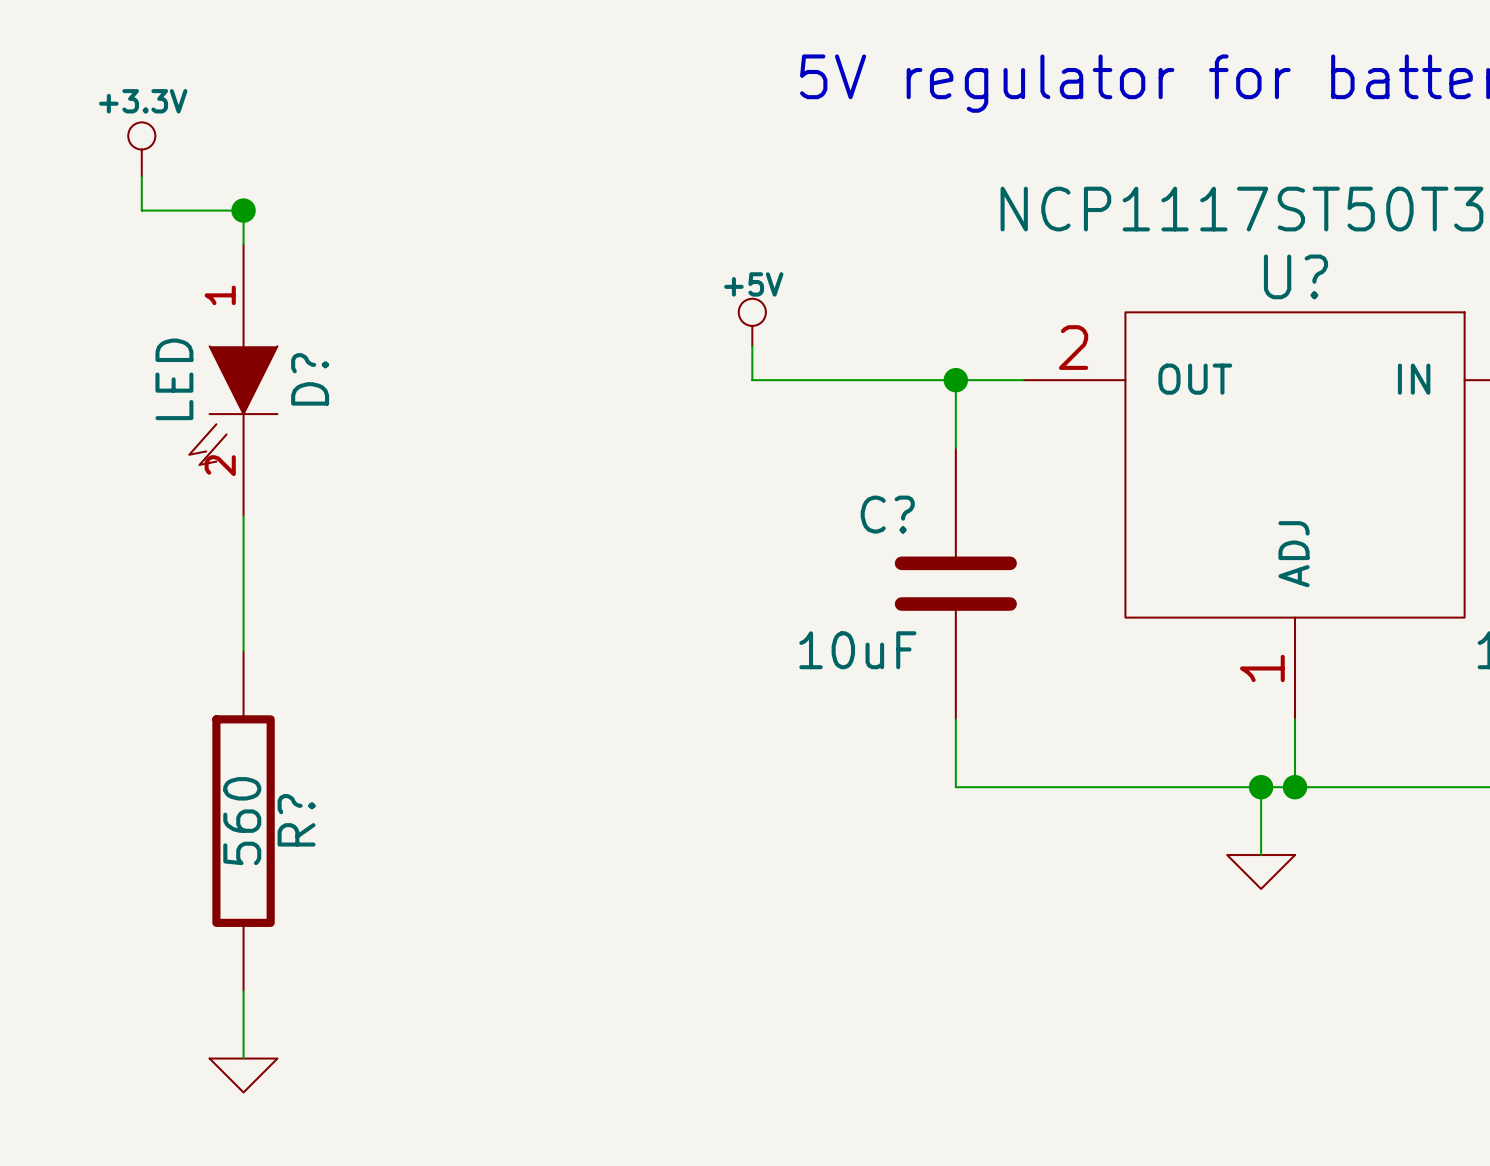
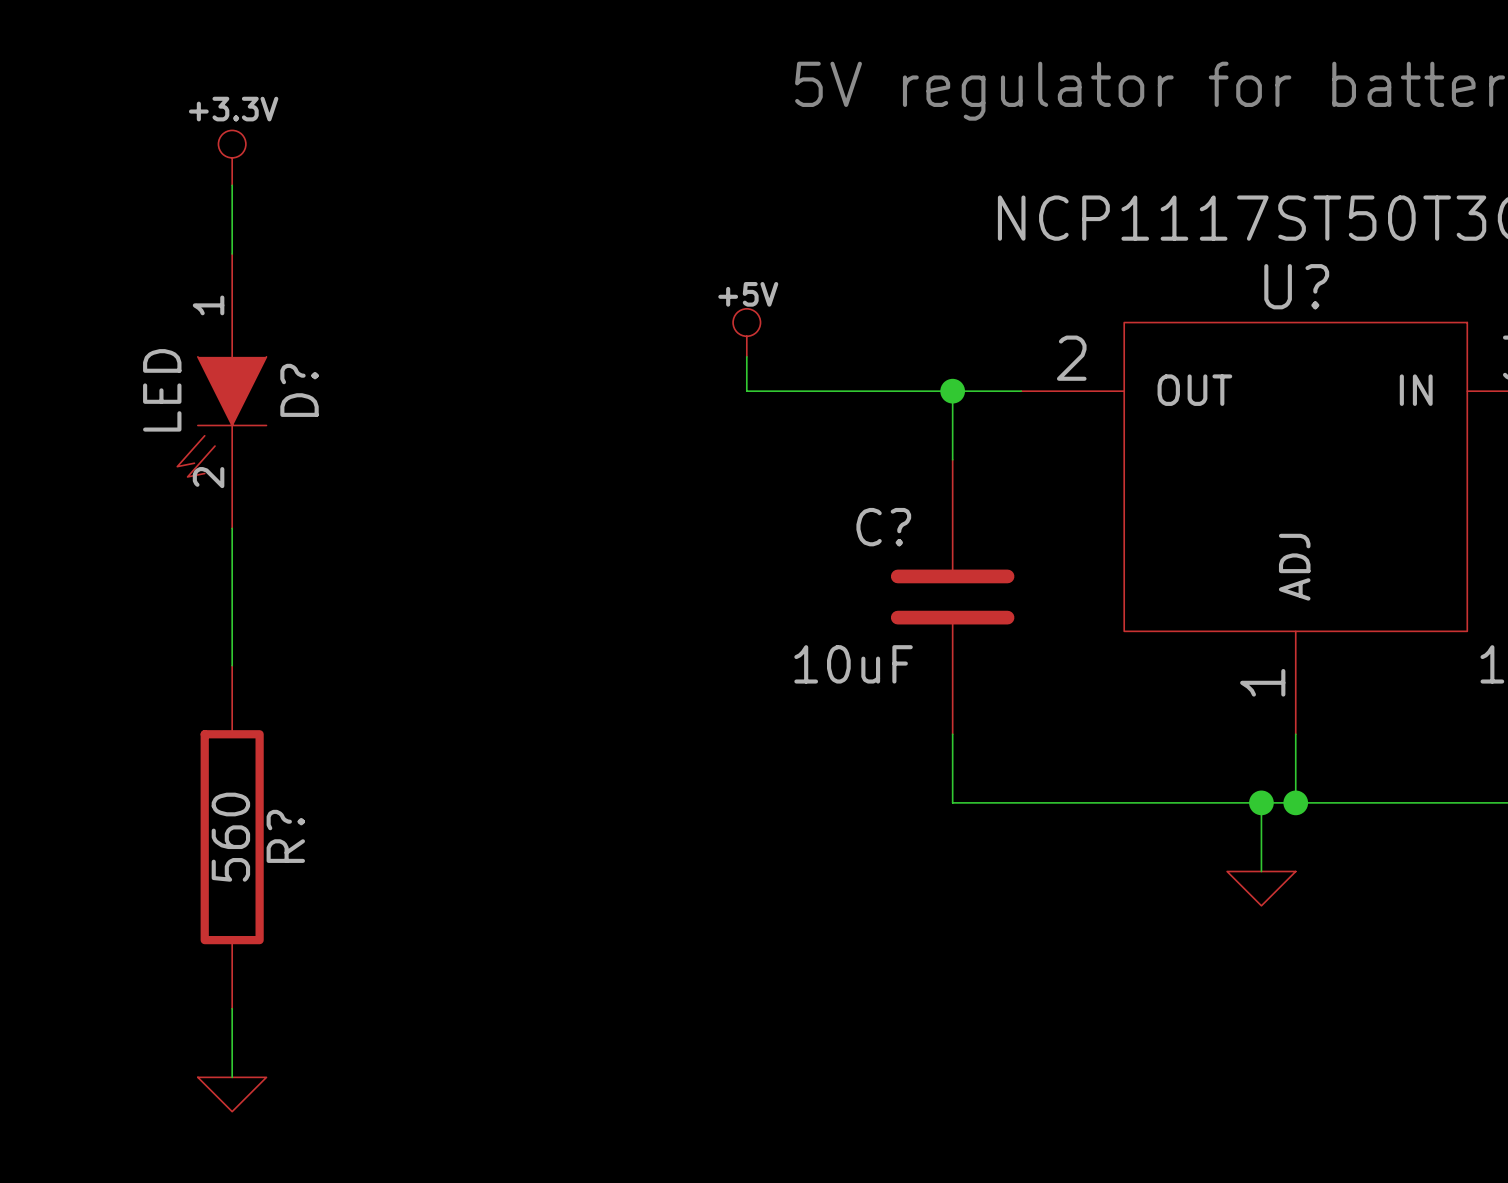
power symbol position: +3.3V (141, 149) -> +3.3V (232, 157)
wire: (141, 176) (141, 210) (243, 210) -> (232, 185) (232, 219)
junction: (243, 210) -> none

